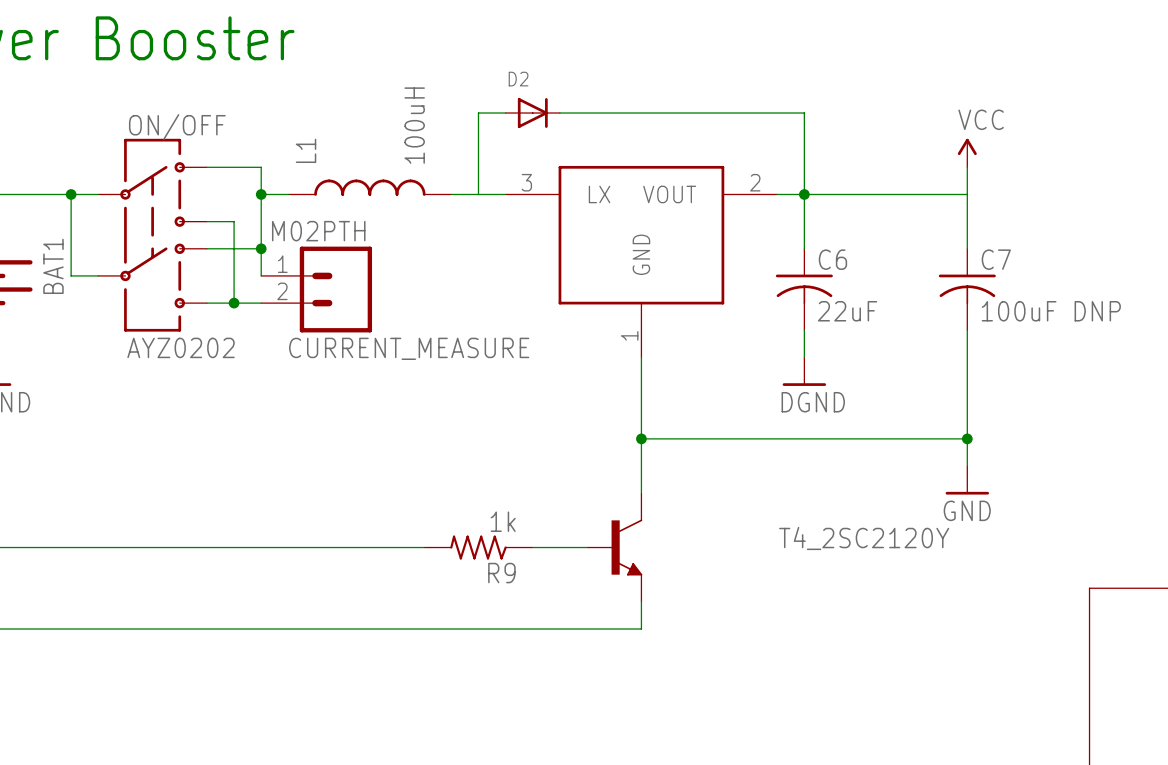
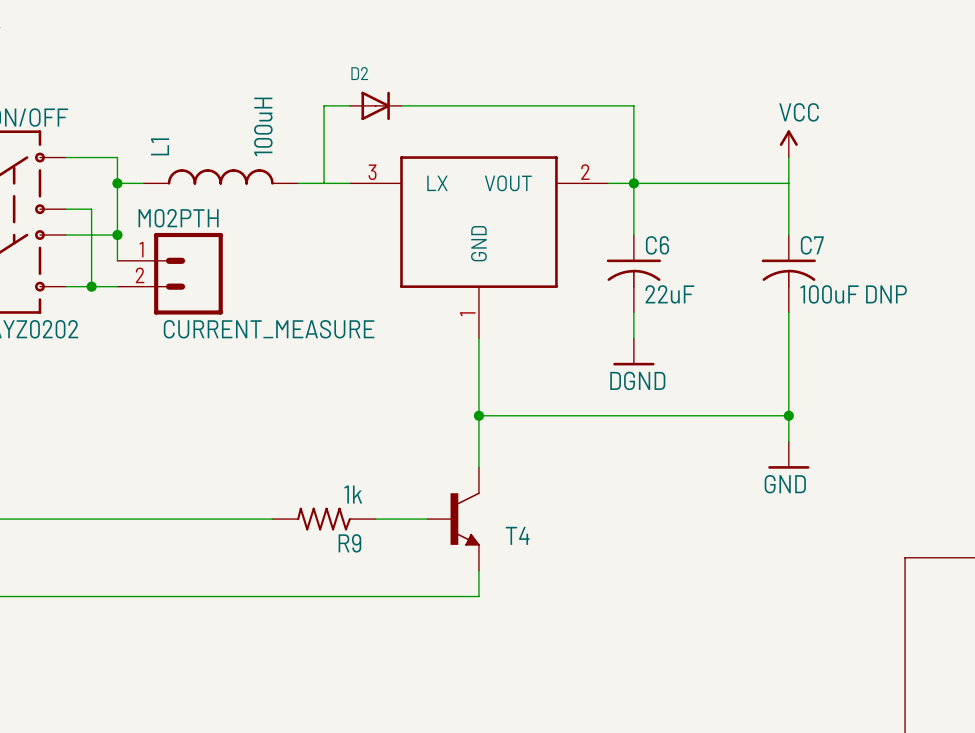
T4_2SC2120Y name: T4_2SC2120Y (864, 538) -> T4 (517, 535)

